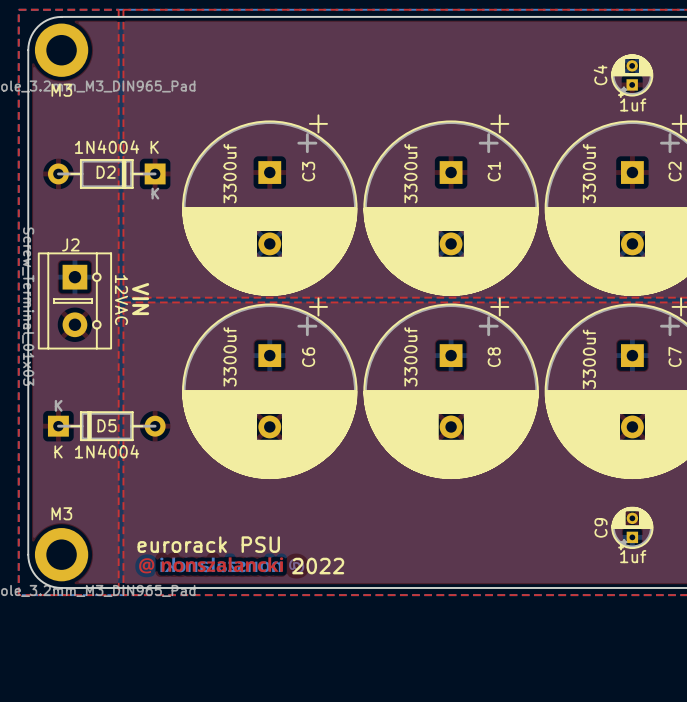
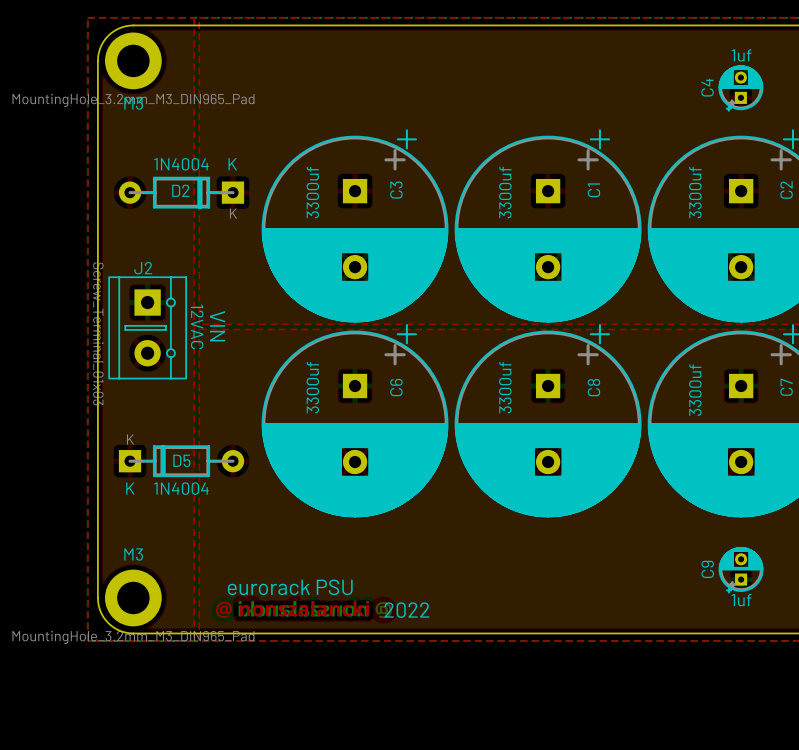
C4 value position: 1uf (633, 104) -> 1uf (741, 55)

